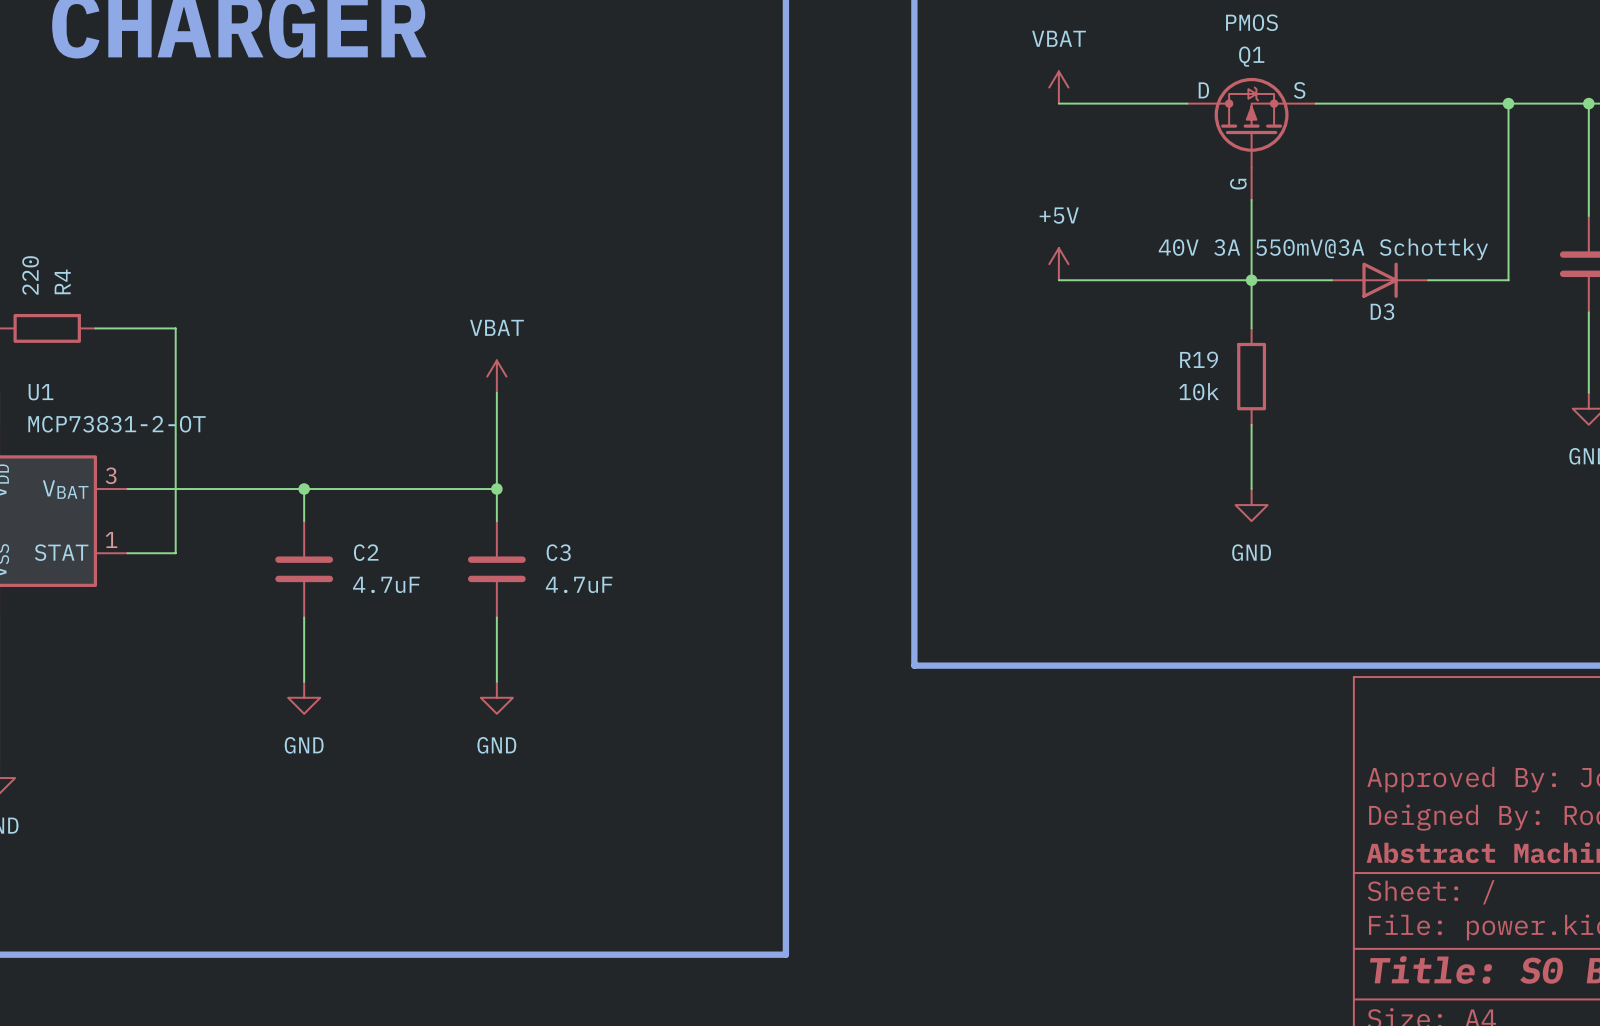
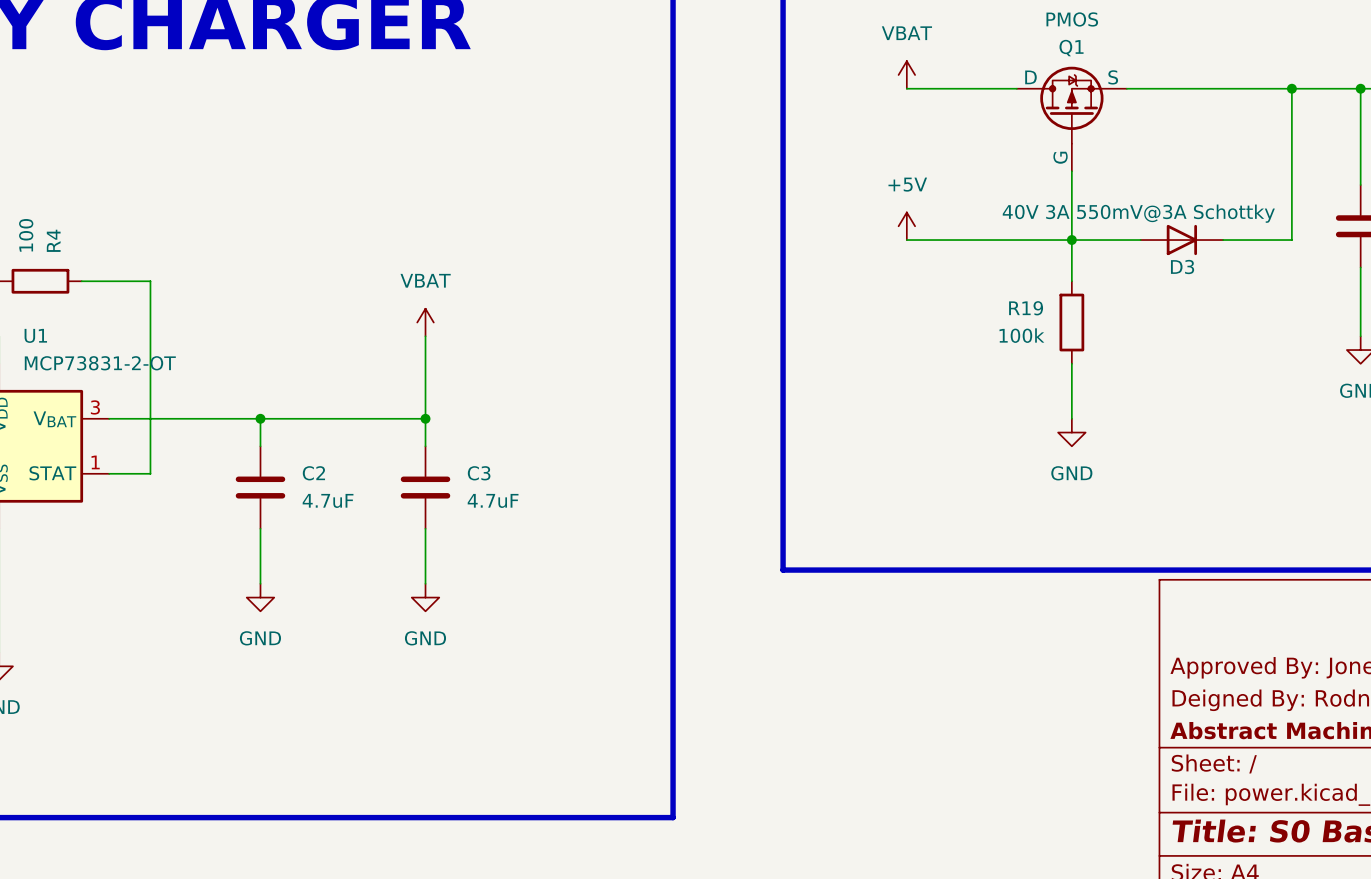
R4 value: 220 (30, 275) -> 100 (26, 235)
R19 value: 10k (1199, 391) -> 100k (1021, 335)

